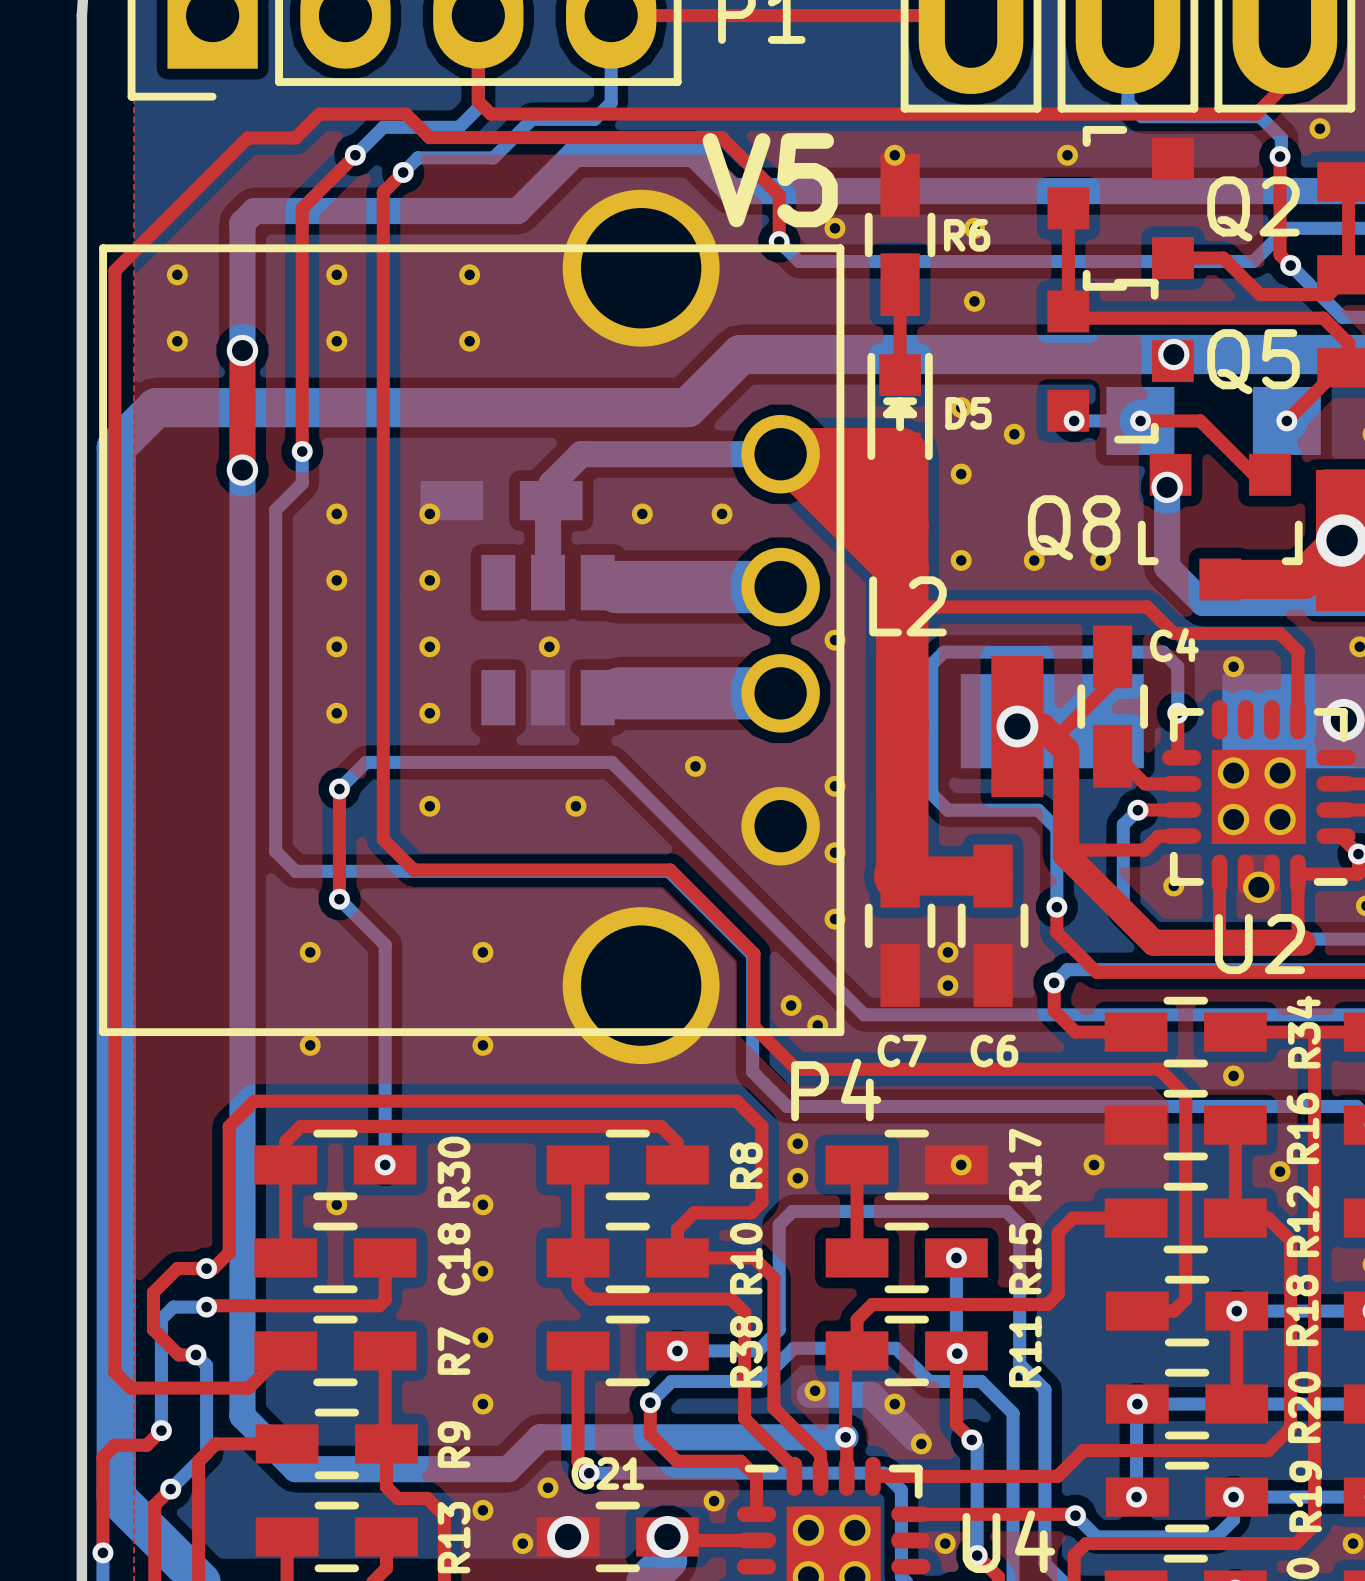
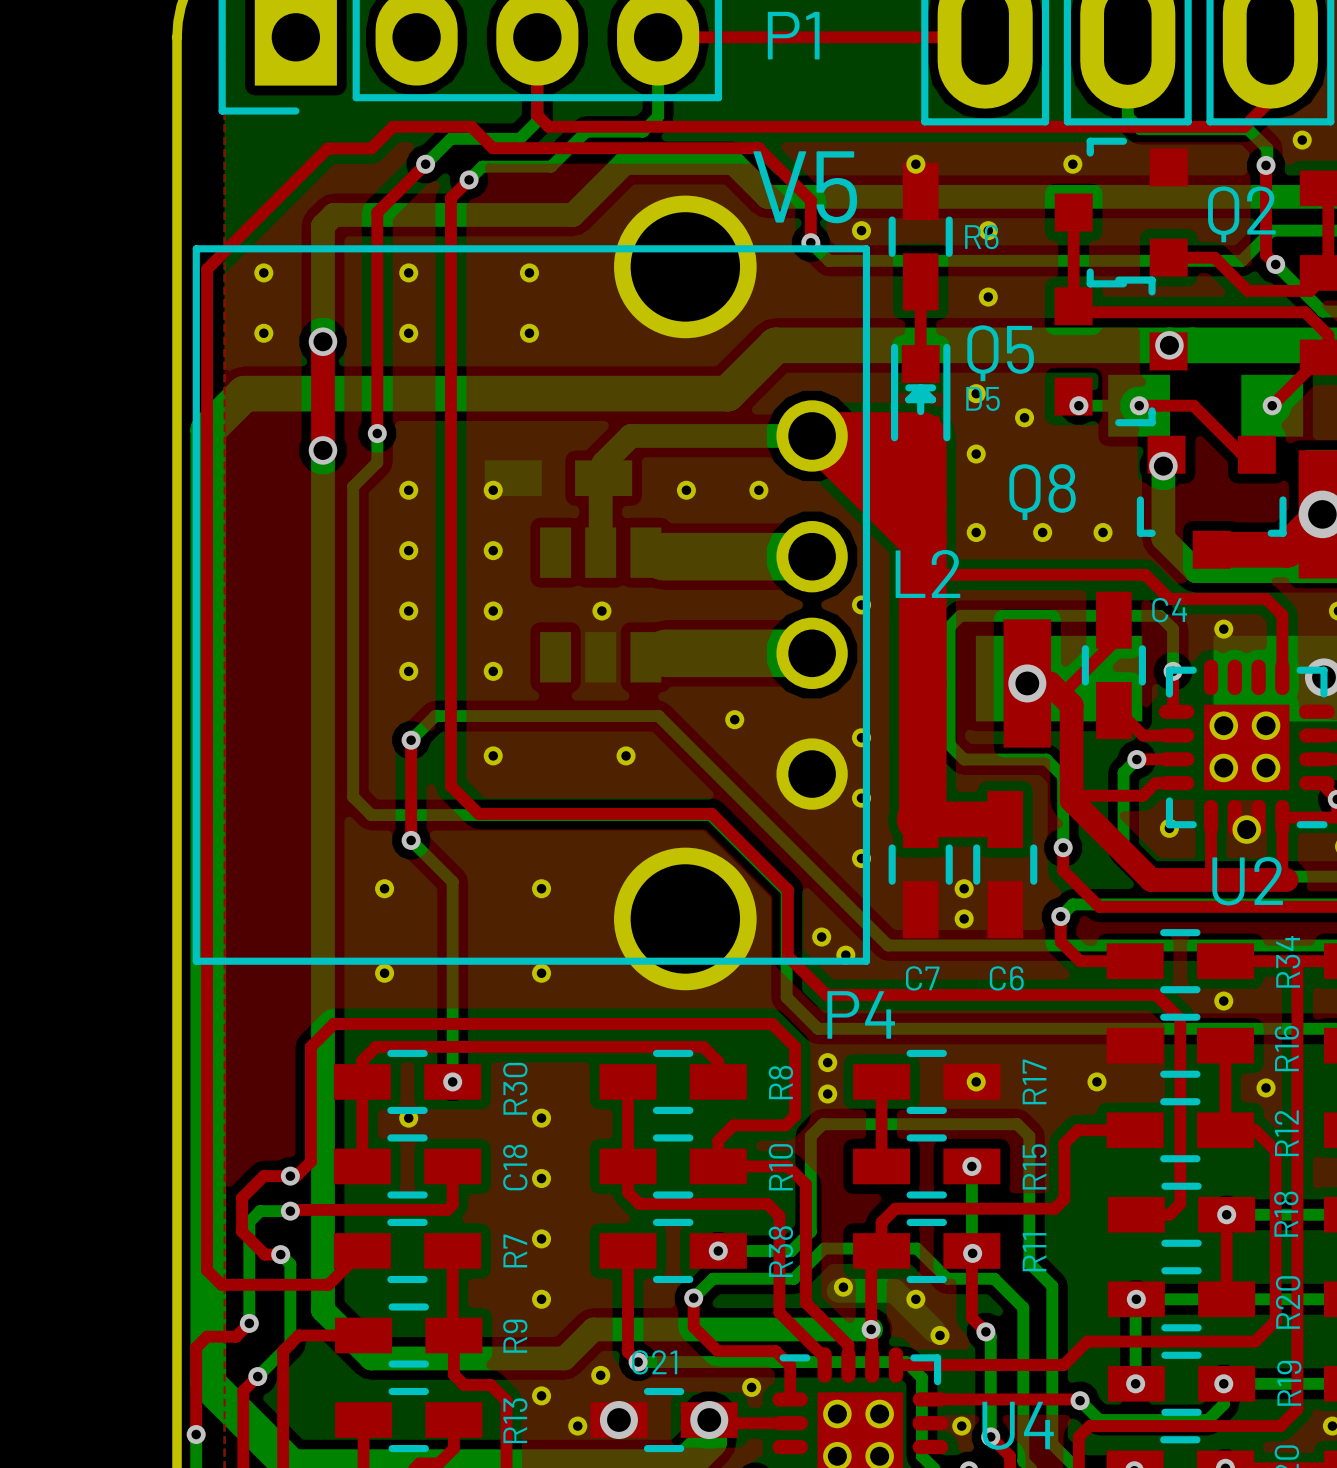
Q5 name position: Q5 (1253, 361) -> Q5 (1000, 353)
Q8 name position: Q8 (1074, 527) -> Q8 (1042, 492)

